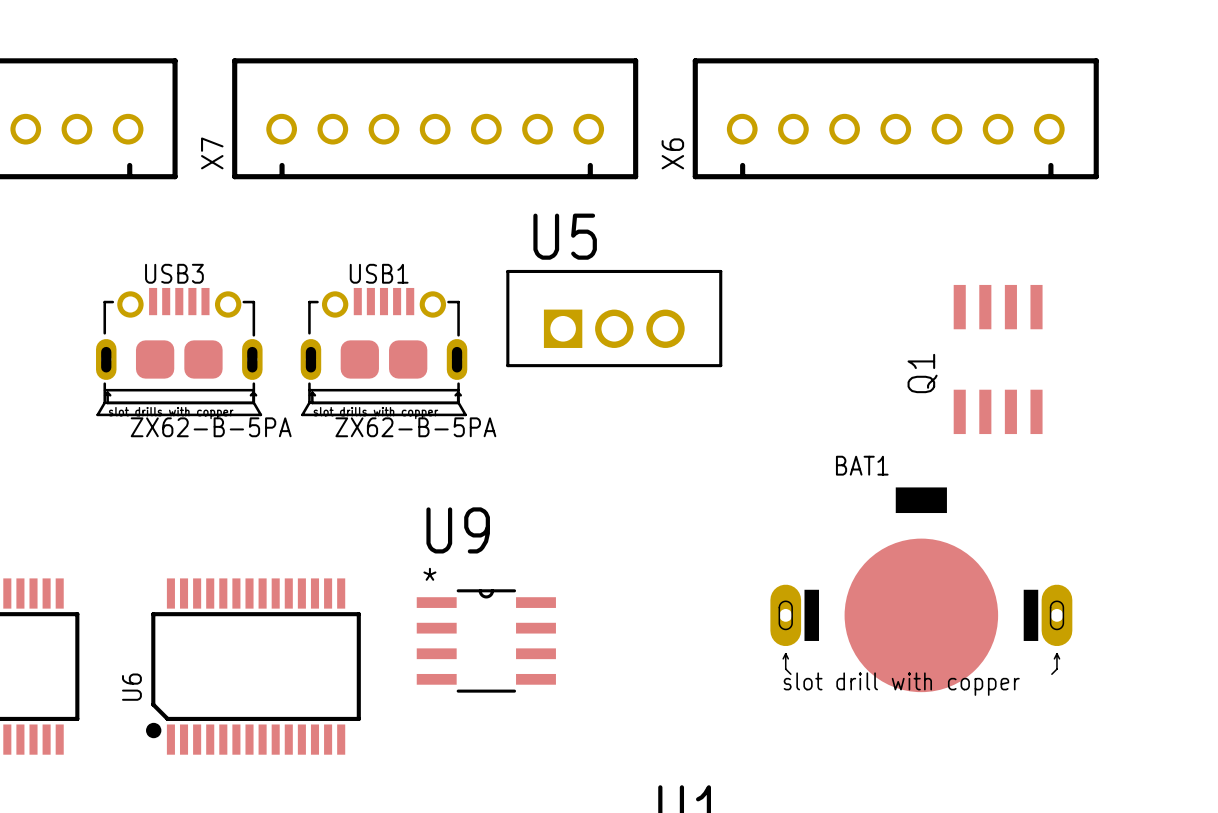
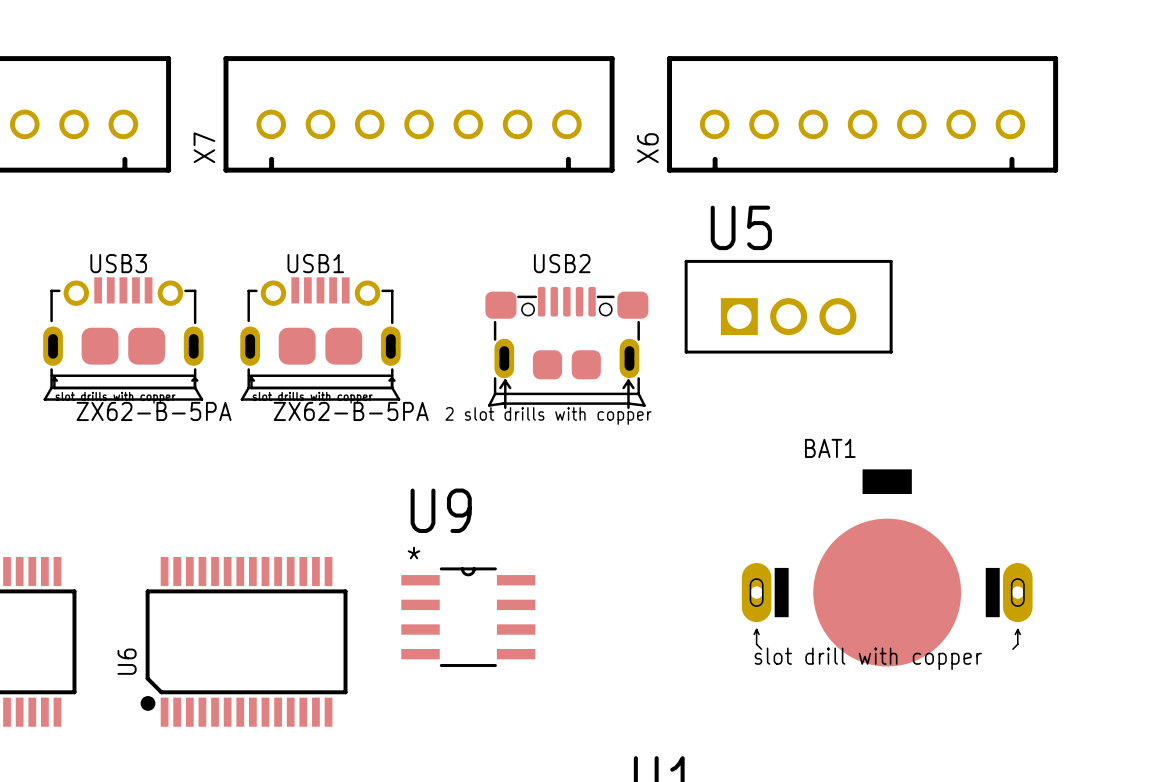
U5 position: (614, 318) -> (788, 306)
USB3 position: (179, 352) -> (123, 339)
USB1 position: (383, 352) -> (320, 339)
Q1: (998, 359) -> none
USB2: none -> (566, 347)

